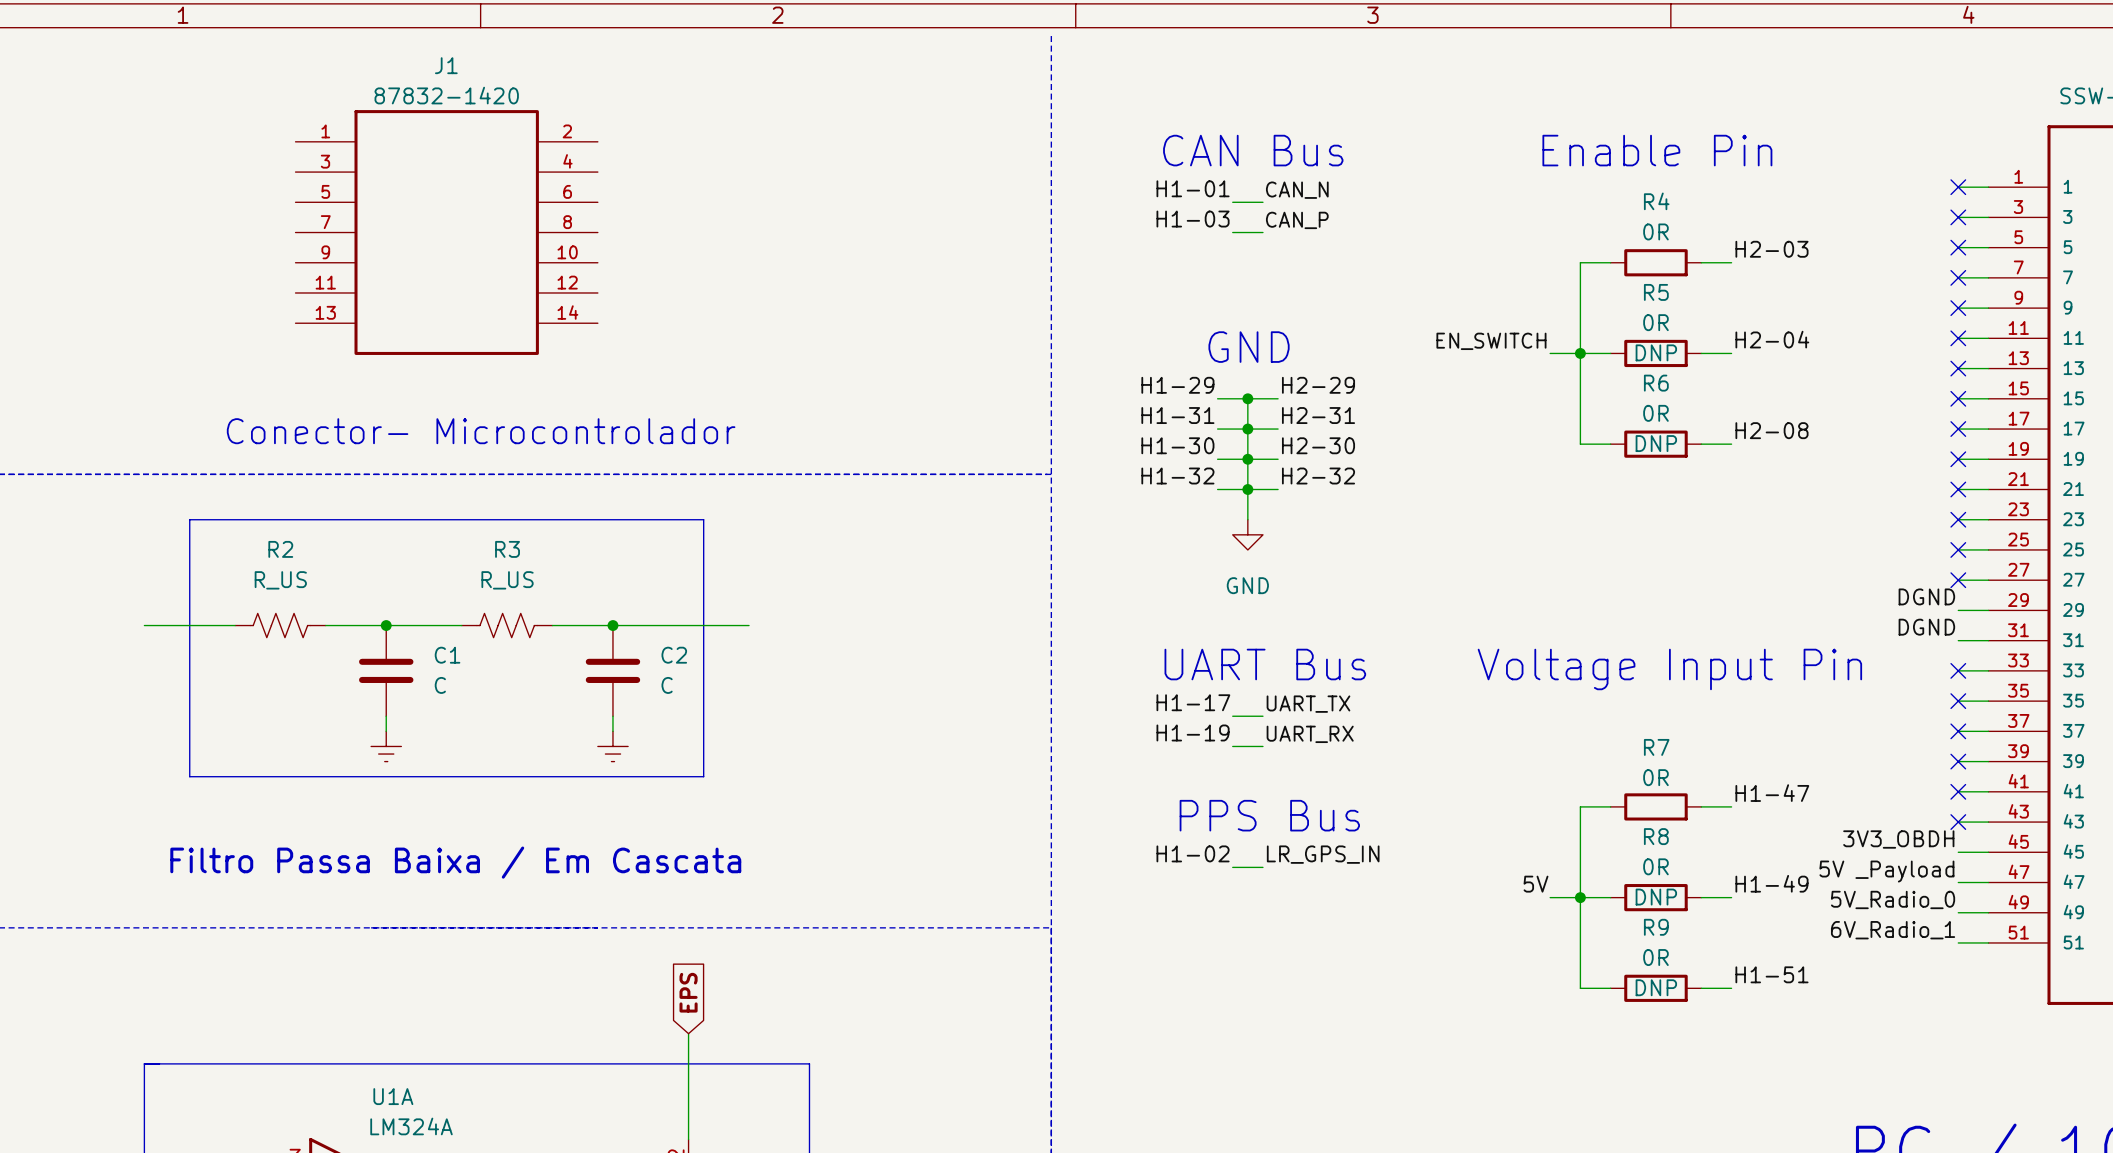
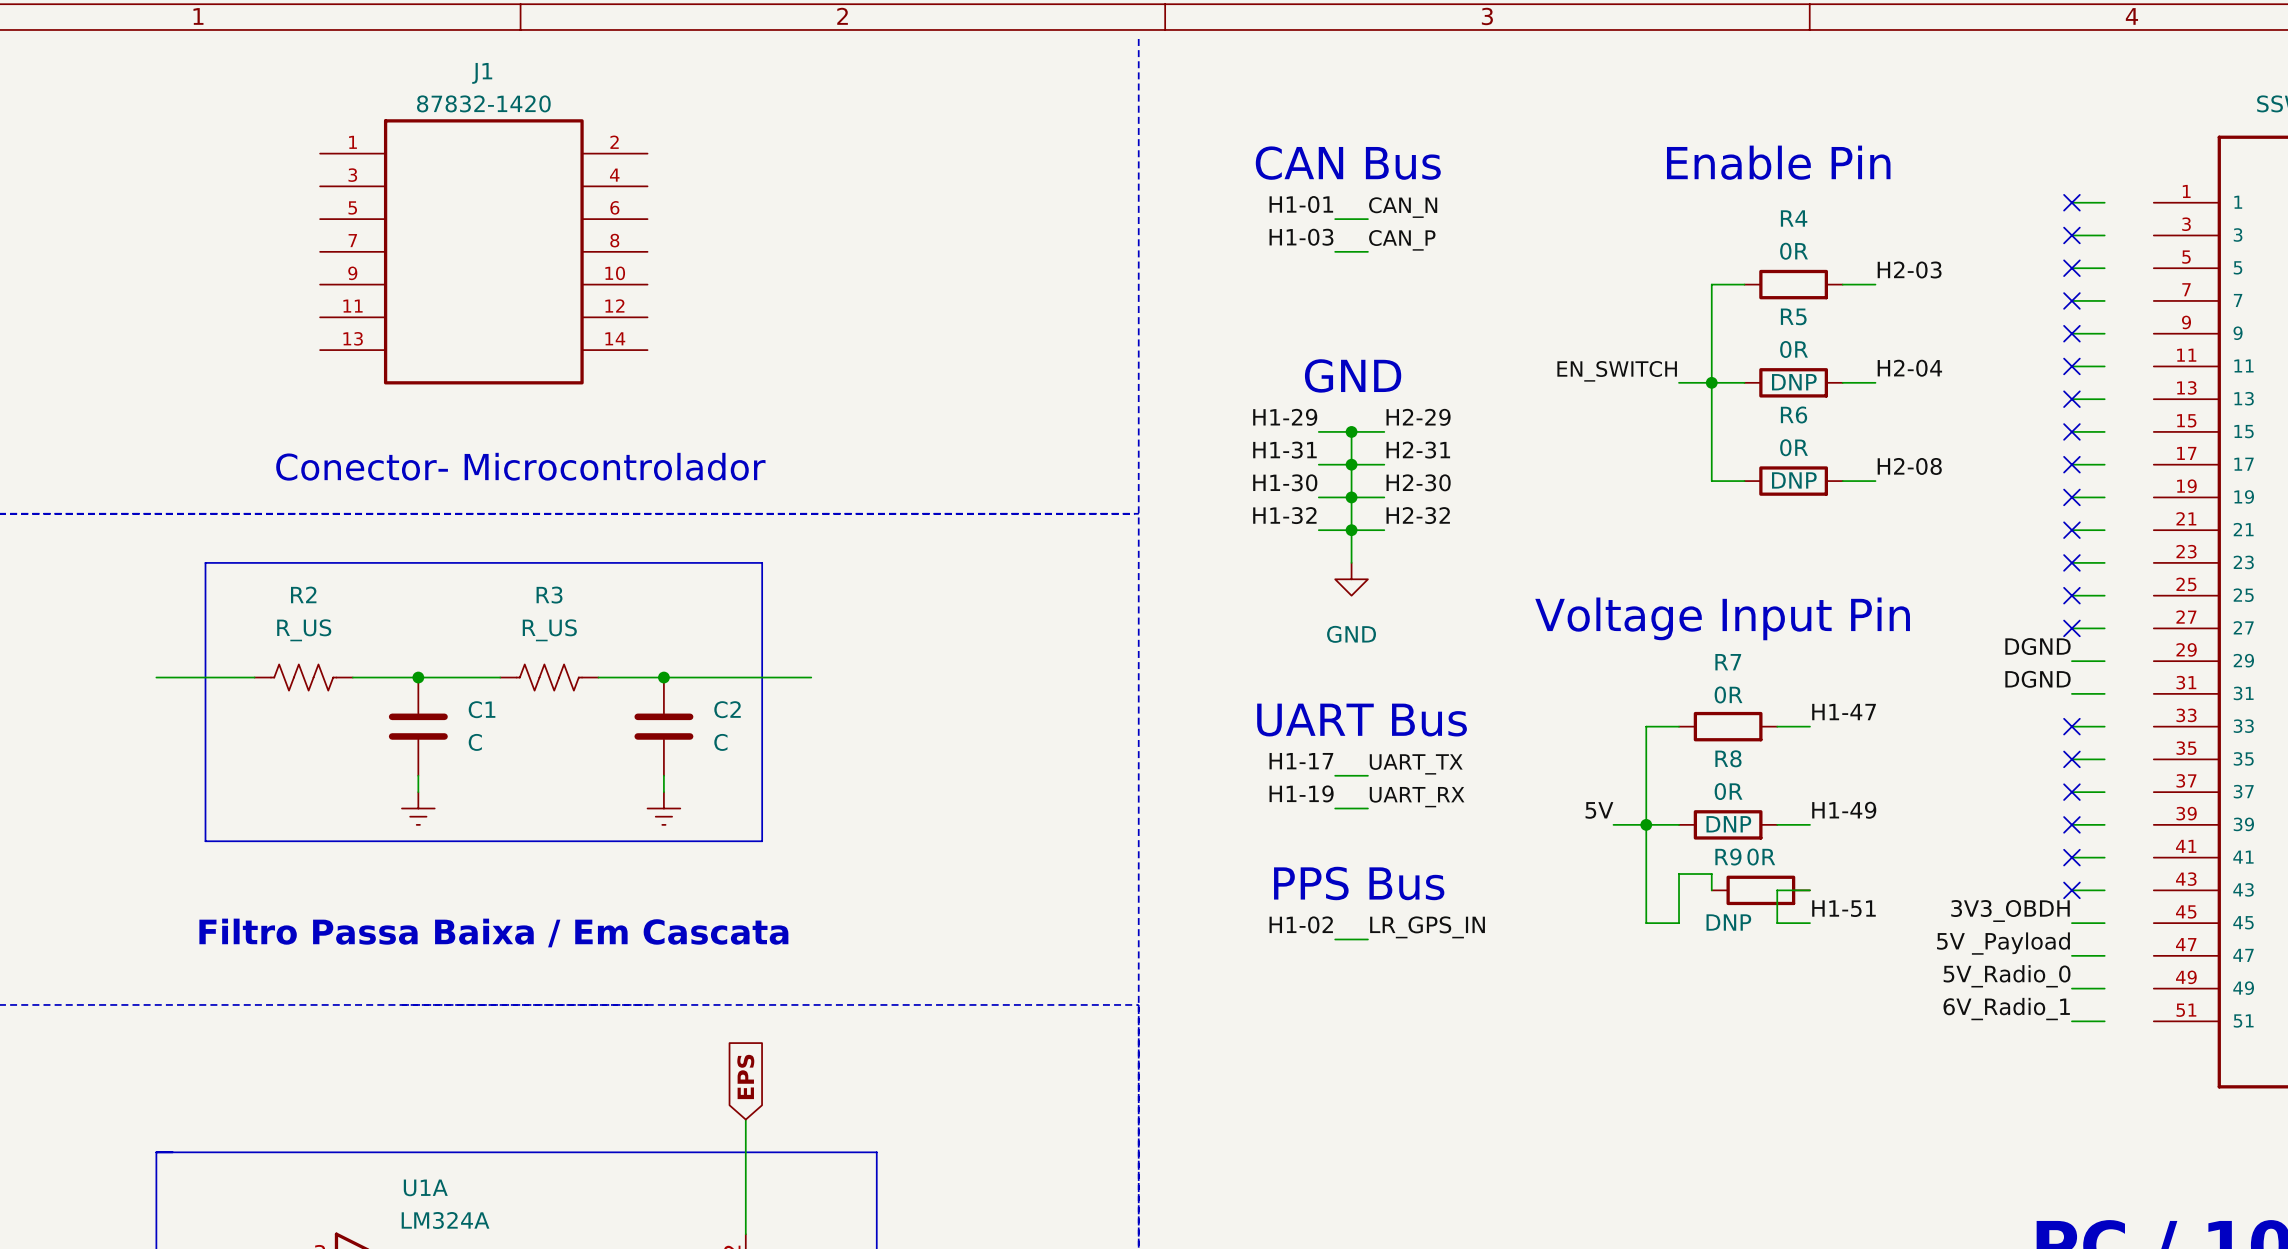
no-connect mark: none -> (2071, 202)
wire: (1958, 187) (1988, 187) -> (2071, 202) (2104, 202)
no-connect mark: (1958, 187) -> none
no-connect mark: none -> (2071, 235)
wire: (1958, 217) (1988, 217) -> (2071, 235) (2104, 235)
no-connect mark: (1958, 217) -> none
no-connect mark: none -> (2071, 268)
wire: (1958, 247) (1988, 247) -> (2071, 268) (2104, 268)
no-connect mark: (1958, 247) -> none
no-connect mark: none -> (2071, 300)
wire: (1958, 277) (1988, 277) -> (2071, 300) (2104, 300)
no-connect mark: (1958, 277) -> none
no-connect mark: none -> (2071, 333)
wire: (1958, 308) (1988, 308) -> (2071, 333) (2104, 333)
no-connect mark: (1958, 308) -> none
no-connect mark: none -> (2071, 366)
wire: (1958, 338) (1988, 338) -> (2071, 366) (2104, 366)
no-connect mark: (1958, 338) -> none
no-connect mark: none -> (2071, 399)
wire: (1958, 368) (1988, 368) -> (2071, 399) (2104, 399)
no-connect mark: (1958, 368) -> none
no-connect mark: none -> (2071, 431)
wire: (1958, 398) (1988, 398) -> (2071, 431) (2104, 431)
no-connect mark: (1958, 398) -> none
no-connect mark: none -> (2071, 464)
wire: (1958, 429) (1988, 429) -> (2071, 464) (2104, 464)
no-connect mark: (1958, 429) -> none
no-connect mark: none -> (2071, 497)
wire: (1958, 459) (1988, 459) -> (2071, 497) (2104, 497)
no-connect mark: (1958, 459) -> none
no-connect mark: none -> (2071, 530)
wire: (1958, 489) (1988, 489) -> (2071, 530) (2104, 530)
no-connect mark: (1958, 489) -> none
no-connect mark: none -> (2071, 562)
wire: (1958, 519) (1988, 519) -> (2071, 562) (2104, 562)
no-connect mark: (1958, 519) -> none
no-connect mark: none -> (2071, 595)
wire: (1958, 549) (1988, 549) -> (2071, 595) (2104, 595)
no-connect mark: (1958, 549) -> none
no-connect mark: none -> (2071, 628)
wire: (1958, 580) (1988, 580) -> (2071, 628) (2104, 628)
no-connect mark: (1958, 580) -> none
label: none -> DGND (2037, 646)
label: DGND (1926, 596) -> none
wire: (1958, 610) (1988, 610) -> (2071, 661) (2104, 661)
label: none -> DGND (2037, 679)
label: DGND (1926, 627) -> none
wire: (1958, 640) (1988, 640) -> (2071, 693) (2104, 693)
text position: Voltage Input Pin (1669, 669) -> Voltage Input Pin (1722, 618)
no-connect mark: none -> (2071, 726)
wire: (1958, 670) (1988, 670) -> (2071, 726) (2104, 726)
no-connect mark: (1958, 670) -> none
no-connect mark: none -> (2071, 759)
wire: (1958, 701) (1988, 701) -> (2071, 759) (2104, 759)
no-connect mark: (1958, 701) -> none
no-connect mark: none -> (2071, 792)
wire: (1958, 731) (1988, 731) -> (2071, 792) (2104, 792)
no-connect mark: (1958, 731) -> none
junction: none -> (1646, 824)
no-connect mark: none -> (2071, 824)
wire: (1958, 761) (1988, 761) -> (2071, 824) (2104, 824)
no-connect mark: (1958, 761) -> none
no-connect mark: none -> (2071, 857)
wire: (1958, 791) (1988, 791) -> (2071, 857) (2104, 857)
no-connect mark: (1958, 791) -> none
label position: H1-47 (1772, 793) -> H1-47 (1844, 712)
wire: (1580, 806) (1610, 806) -> (1711, 874) (1679, 874) (1679, 923) (1646, 923) (1646, 726) (1679, 726)
R7 position: (1655, 806) -> (1728, 726)
wire: (1701, 806) (1731, 806) -> (1777, 726) (1809, 726)
wire: (1580, 822) (1580, 988) (1610, 988) -> none
wire: none -> (1809, 890) (1777, 890) (1777, 923) (1809, 923)
no-connect mark: none -> (2071, 890)
wire: (1958, 822) (1988, 822) -> (2071, 890) (2104, 890)
no-connect mark: (1958, 822) -> none
label position: 3V3_OBDH (1898, 839) -> 3V3_OBDH (2010, 911)
wire: (1958, 852) (1988, 852) -> (2071, 923) (2104, 923)
label position: 5V _Payload (1886, 871) -> 5V _Payload (2003, 943)
wire: (1958, 882) (1988, 882) -> (2071, 955) (2104, 955)
label position: H1-49 (1771, 883) -> H1-49 (1844, 810)
label position: 5V (1536, 884) -> 5V (1599, 810)
wire: (1550, 897) (1610, 897) -> (1613, 824) (1679, 824)
junction: (1580, 897) -> none
R8 position: (1655, 897) -> (1728, 824)
wire: (1701, 897) (1731, 897) -> (1777, 824) (1809, 824)
label position: 5V_Radio_0 (1893, 899) -> 5V_Radio_0 (2007, 976)
wire: (1958, 912) (1988, 912) -> (2071, 988) (2104, 988)
R9 name position: R9 (1656, 927) -> R9 (1728, 857)
label position: 6V_Radio_1 (1893, 930) -> 6V_Radio_1 (2006, 1009)
wire: (1958, 942) (1988, 942) -> (2071, 1021) (2104, 1021)
label position: H1-51 (1771, 974) -> H1-51 (1843, 908)
R9 text position: DNP (1656, 987) -> DNP (1728, 922)
R9 position: (1655, 988) -> (1760, 890)
wire: (1701, 988) (1731, 988) -> none

